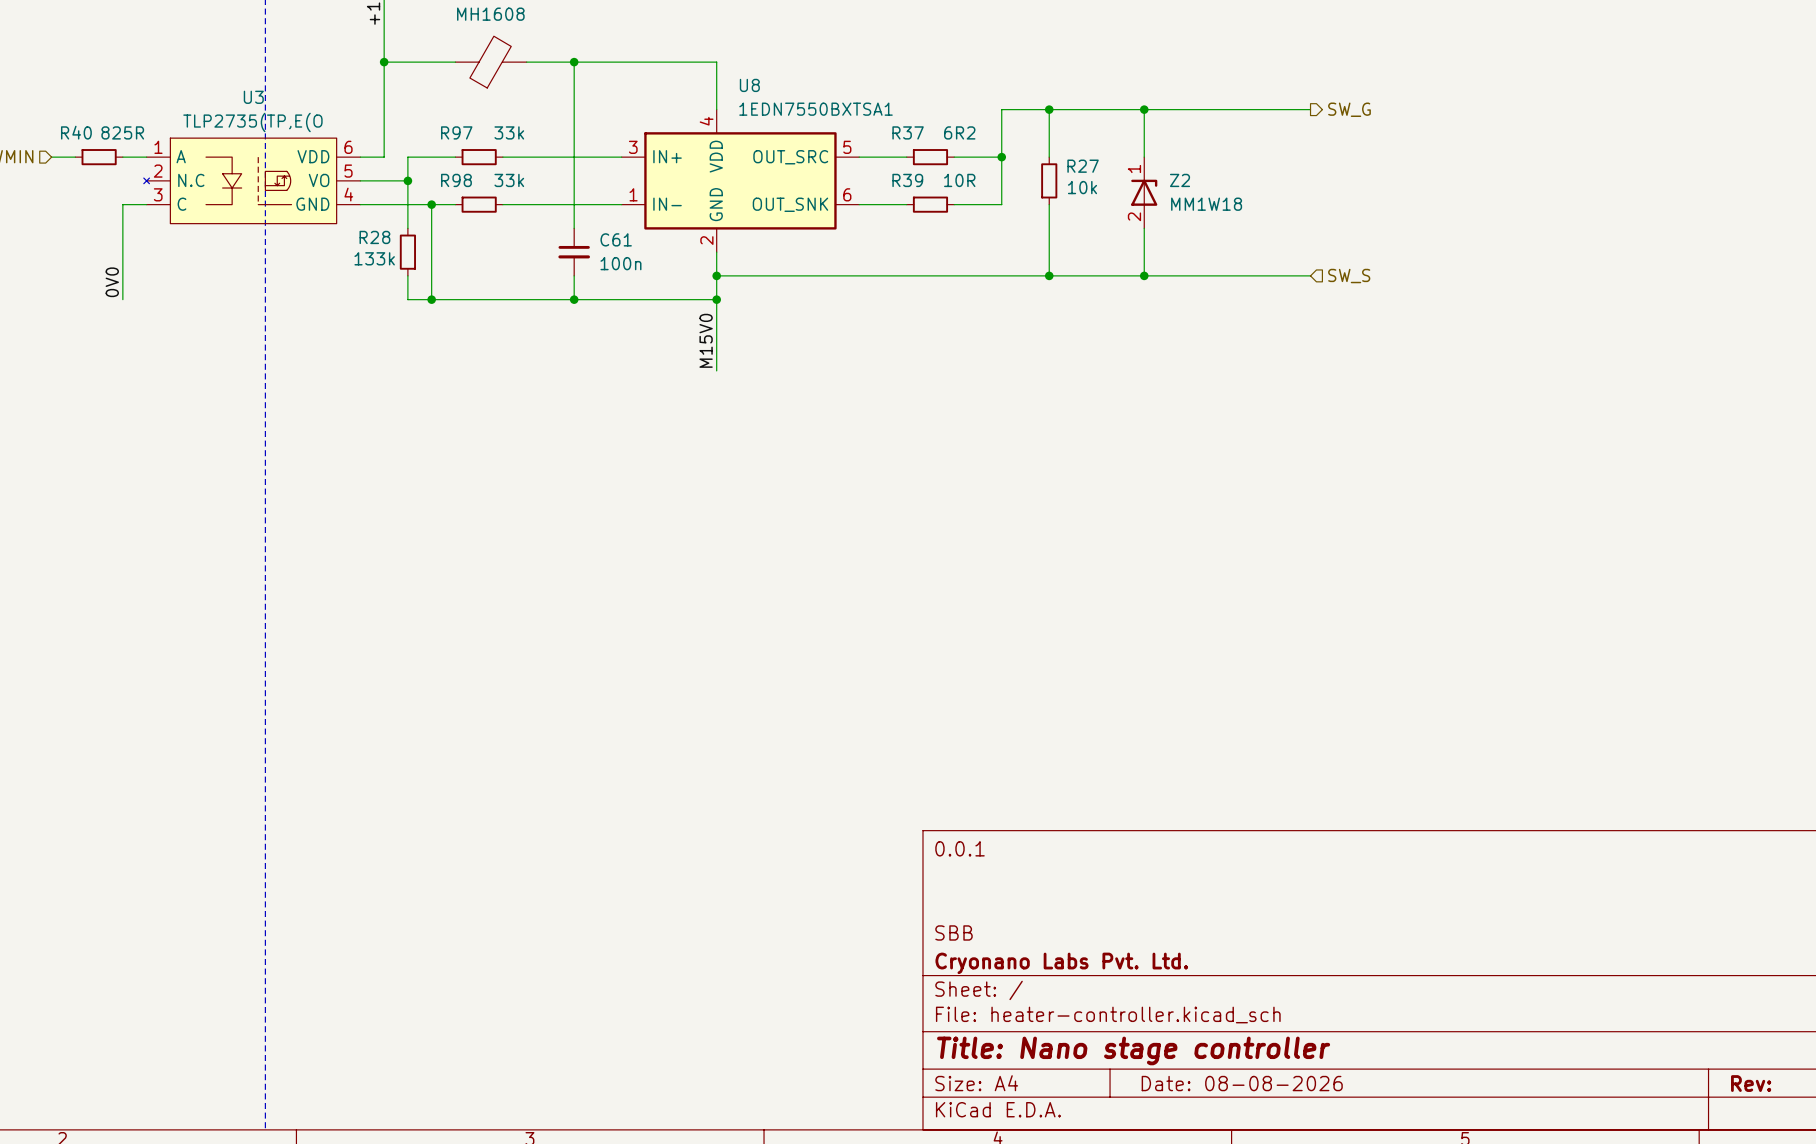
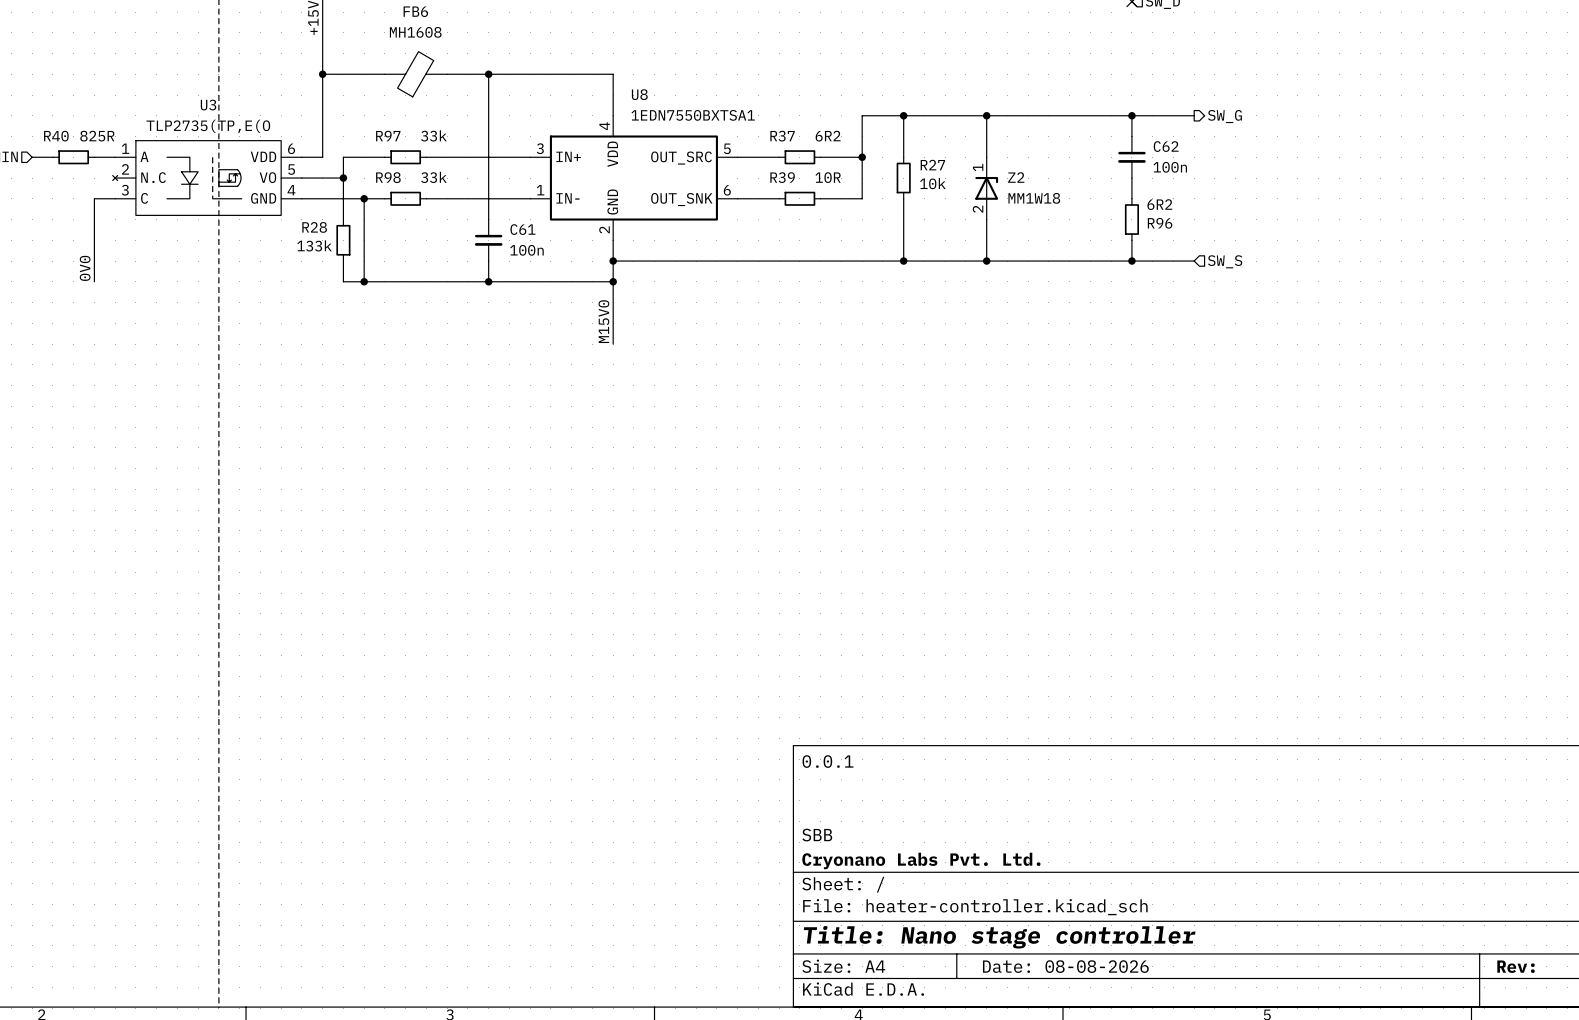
junction: none -> (1131, 115)
hierarchical label position: SW_G (1349, 109) -> SW_G (1224, 116)
wire: none -> (1194, 115) (1131, 115) (1131, 136)
C62: none -> 100n (1131, 157)
wire: none -> (1131, 178) (1131, 198)
R96: none -> 6R2 (1131, 219)
wire: none -> (1131, 240) (1131, 261) (1194, 261)
junction: none -> (1131, 261)
hierarchical label position: SW_S (1349, 276) -> SW_S (1225, 261)

